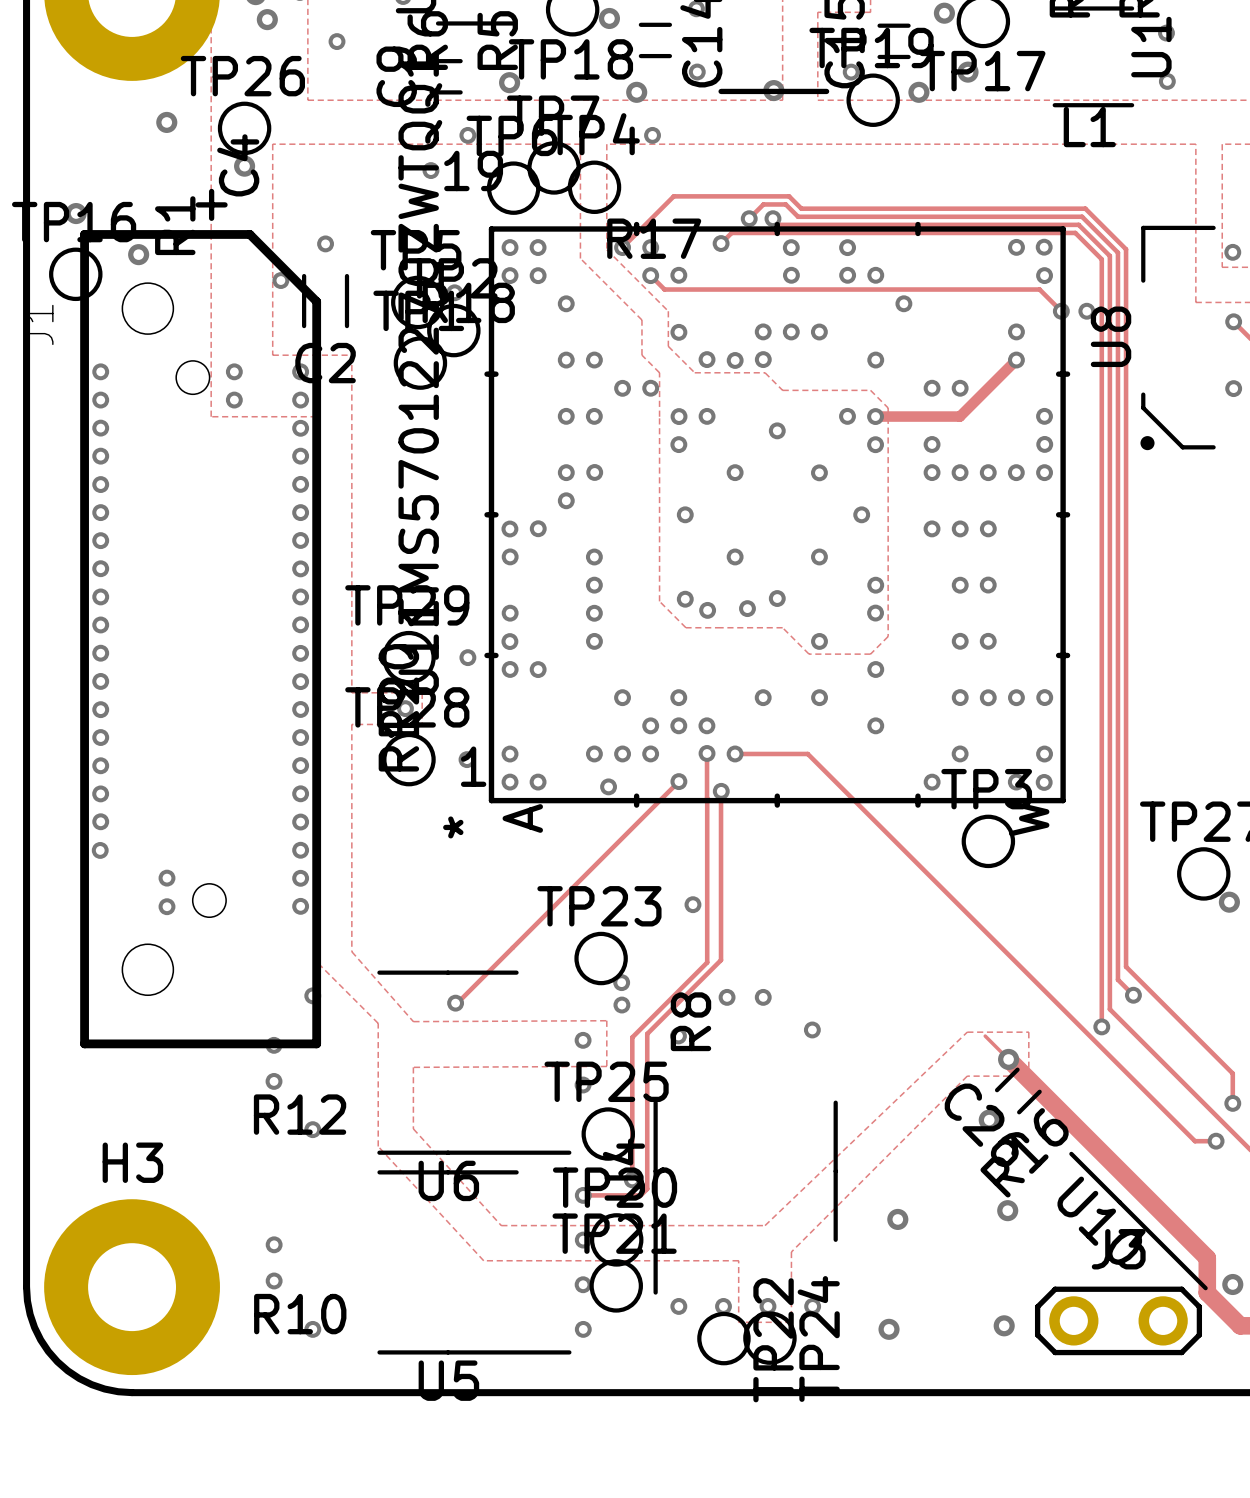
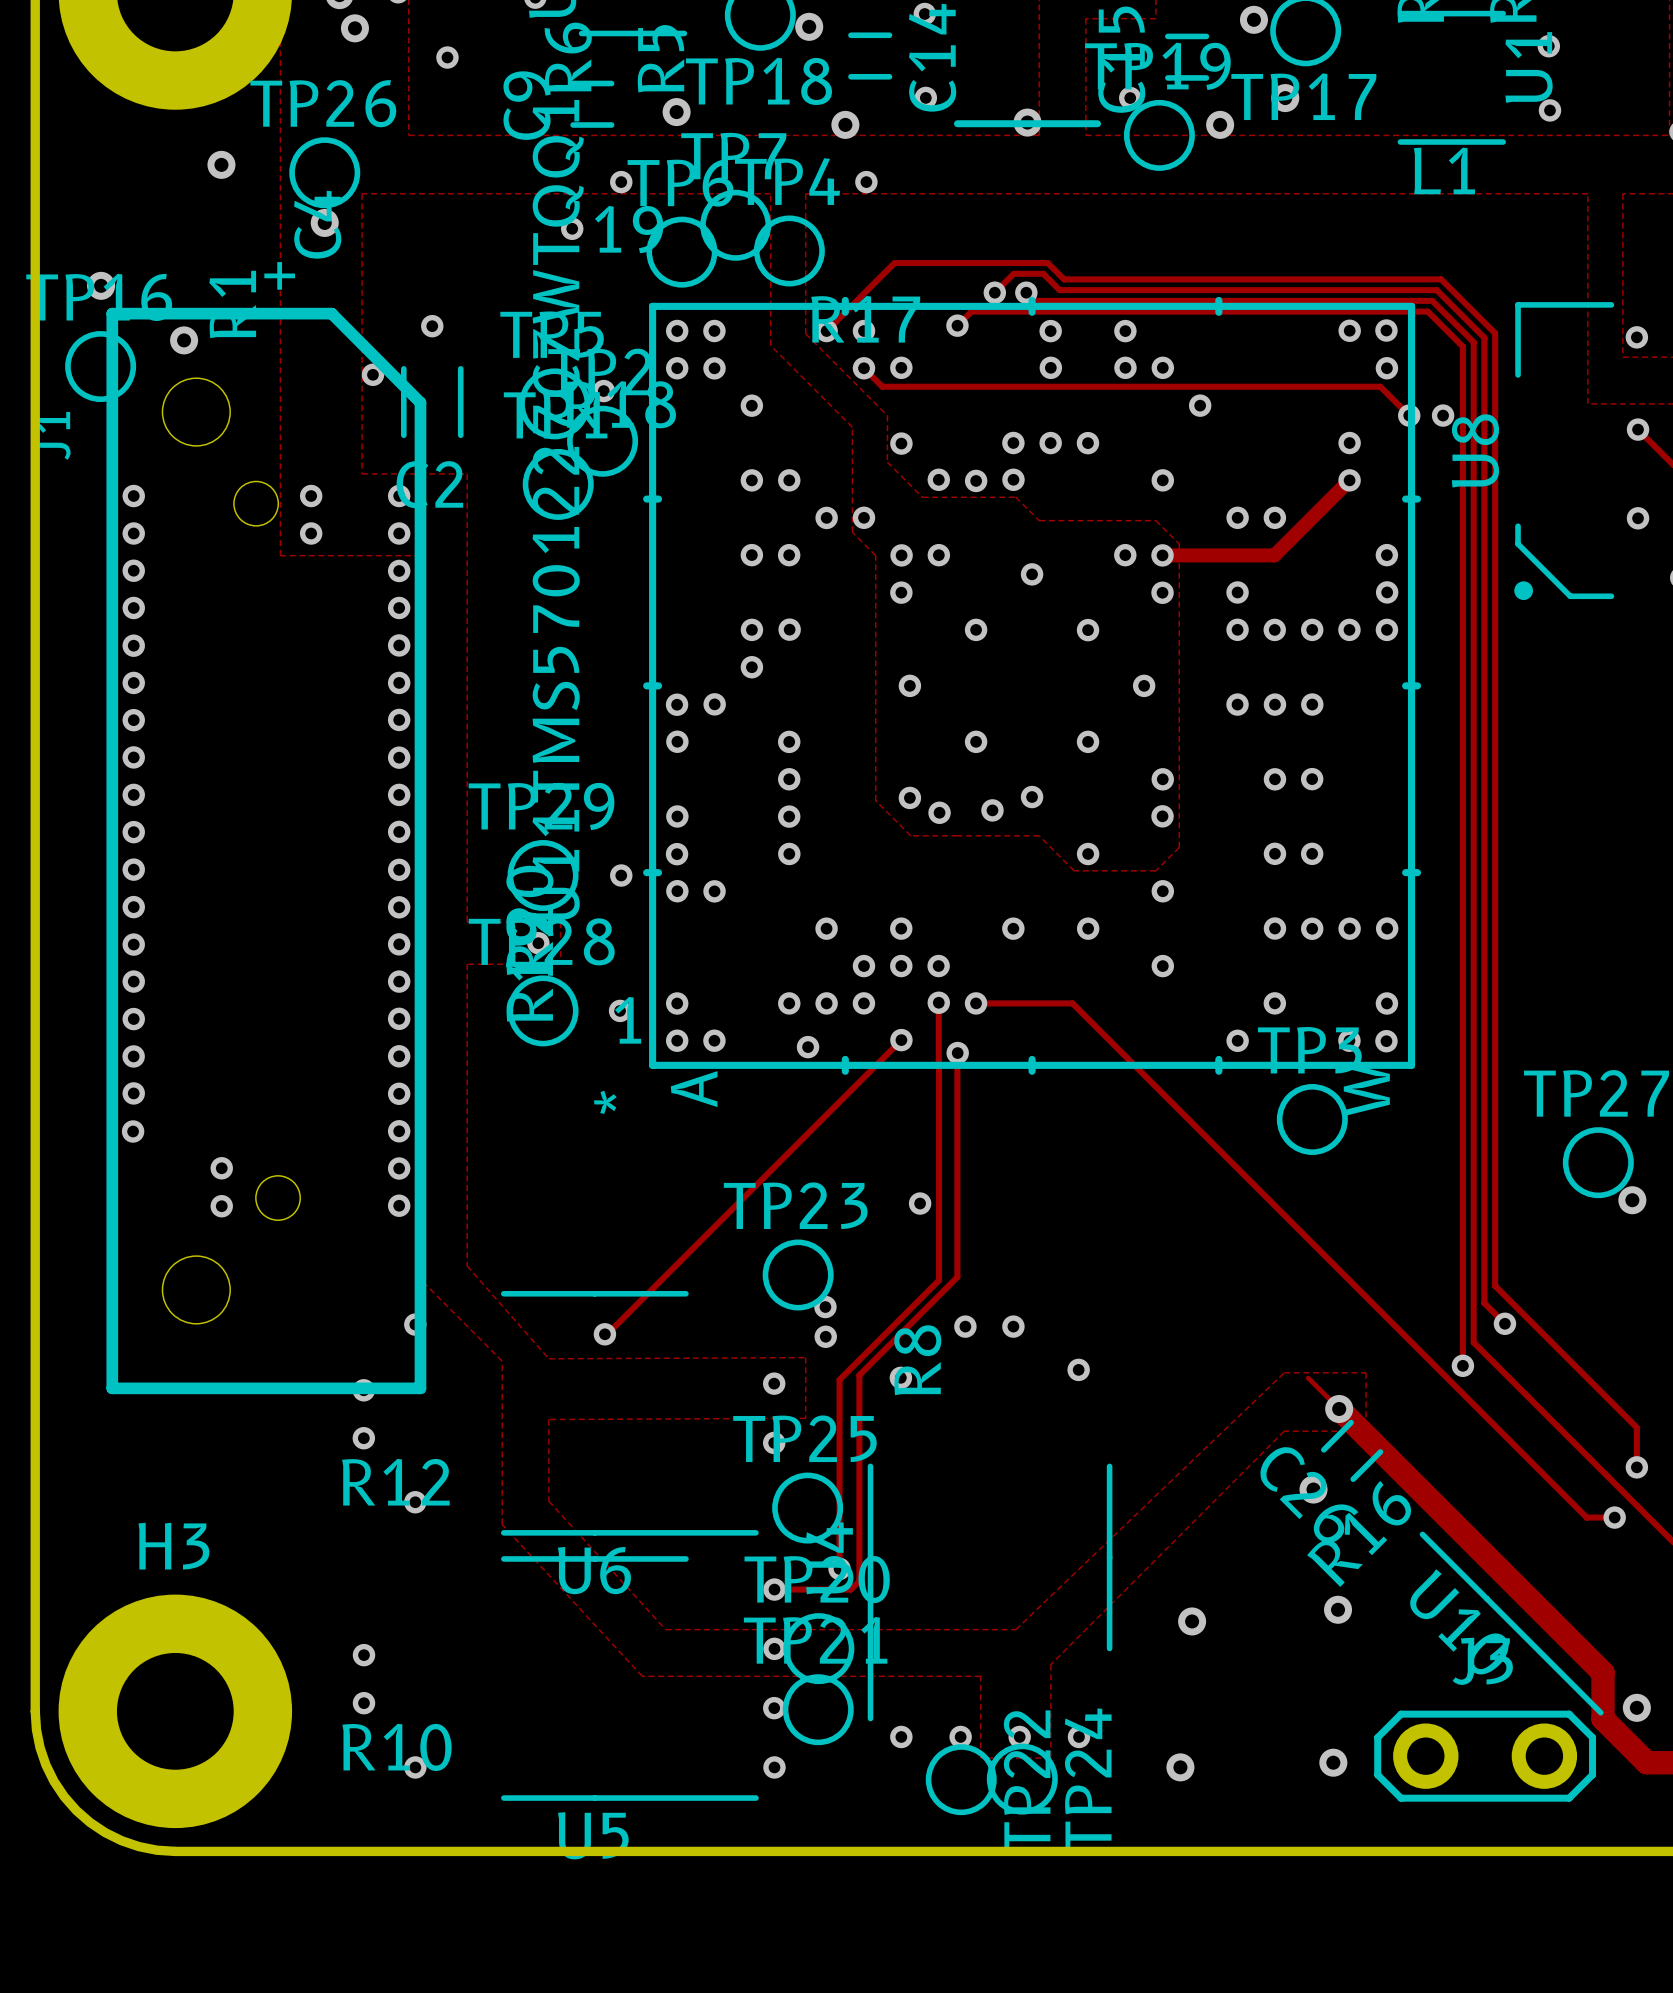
zone outline: (641, 355) (659, 372) (659, 416) -> (852, 473) (852, 532) (875, 555)

